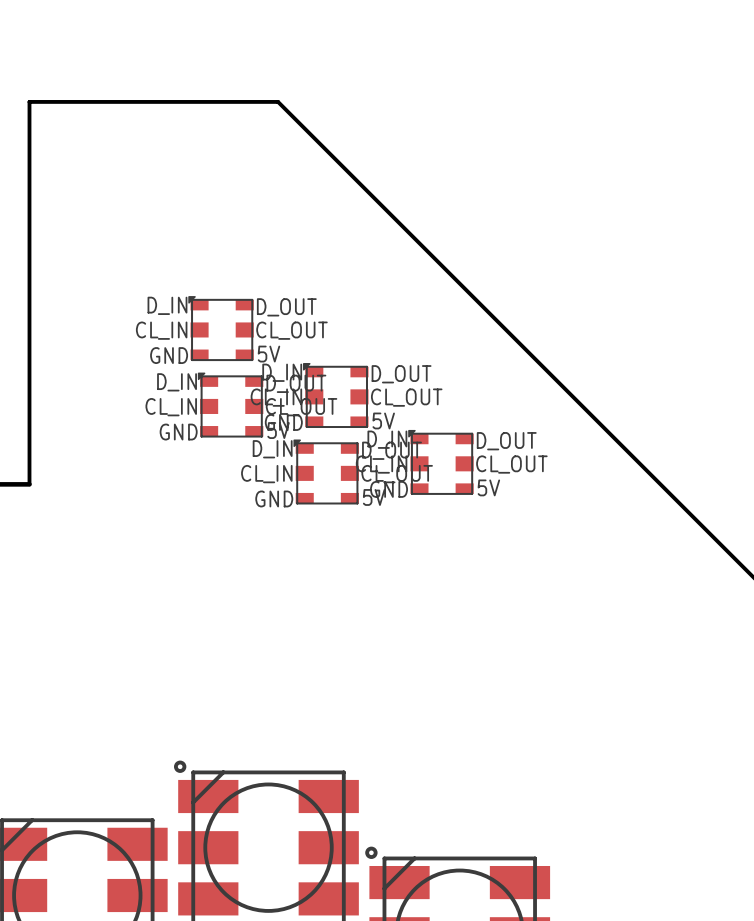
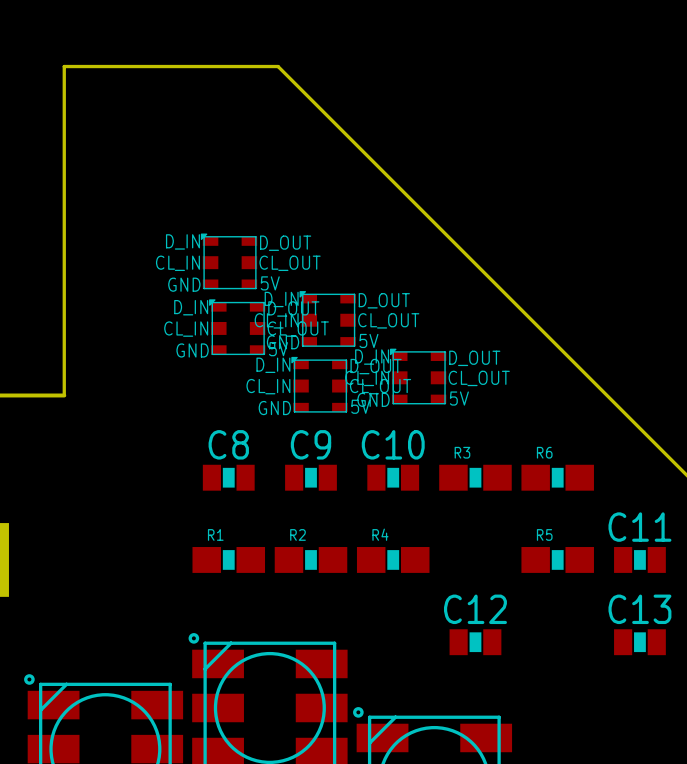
C8: none -> (228, 477)
C9: none -> (310, 477)
C10: none -> (393, 477)
R3: none -> (475, 477)
R6: none -> (557, 477)
R1: none -> (228, 559)
R2: none -> (310, 559)
R4: none -> (393, 559)
R5: none -> (557, 559)
C11: none -> (639, 559)
C12: none -> (475, 642)
C13: none -> (639, 642)

